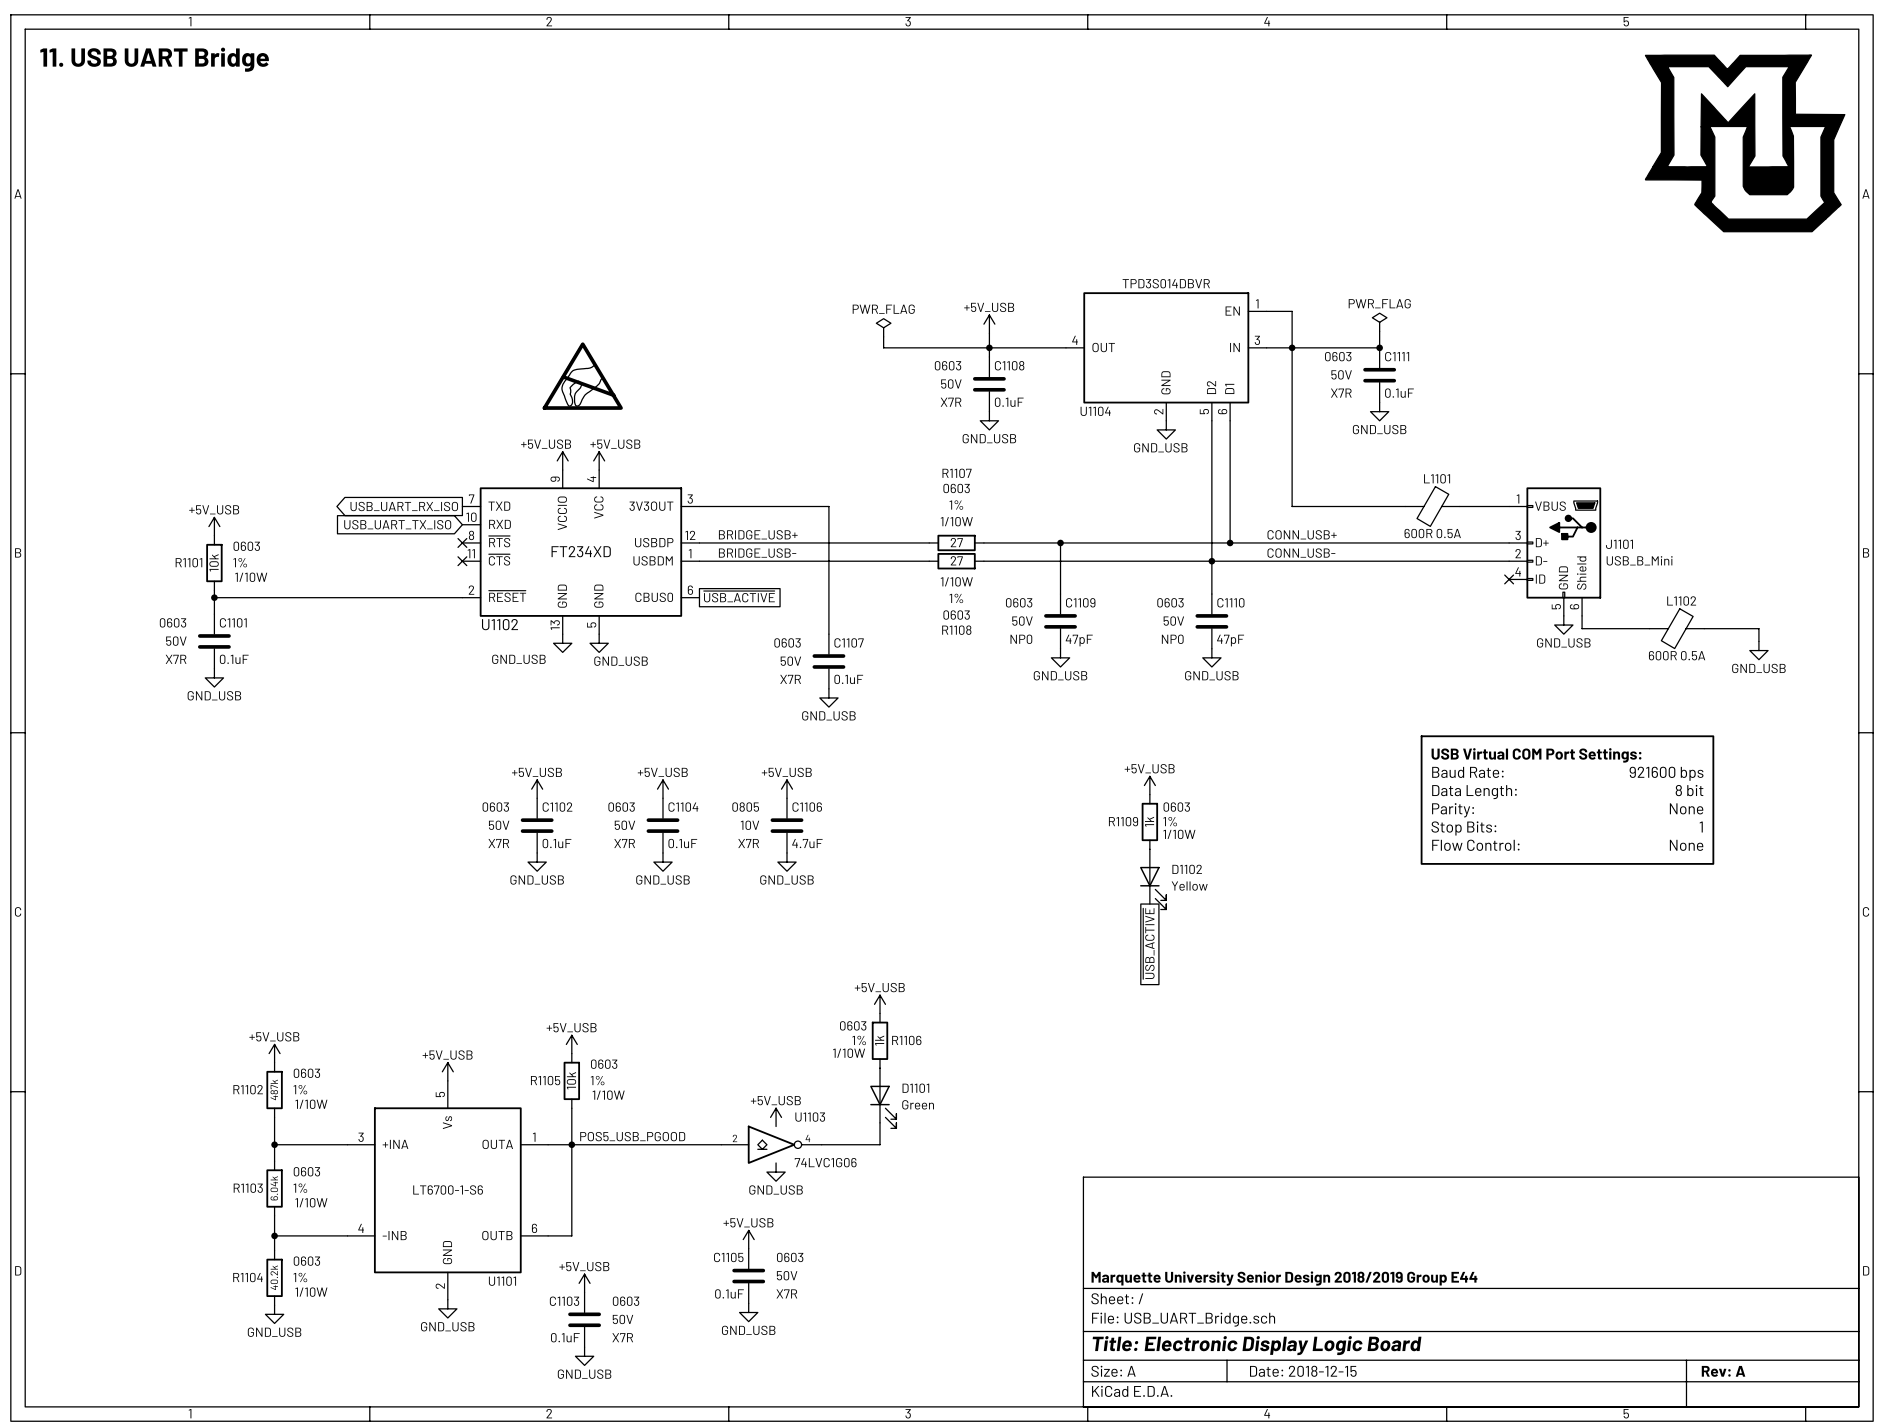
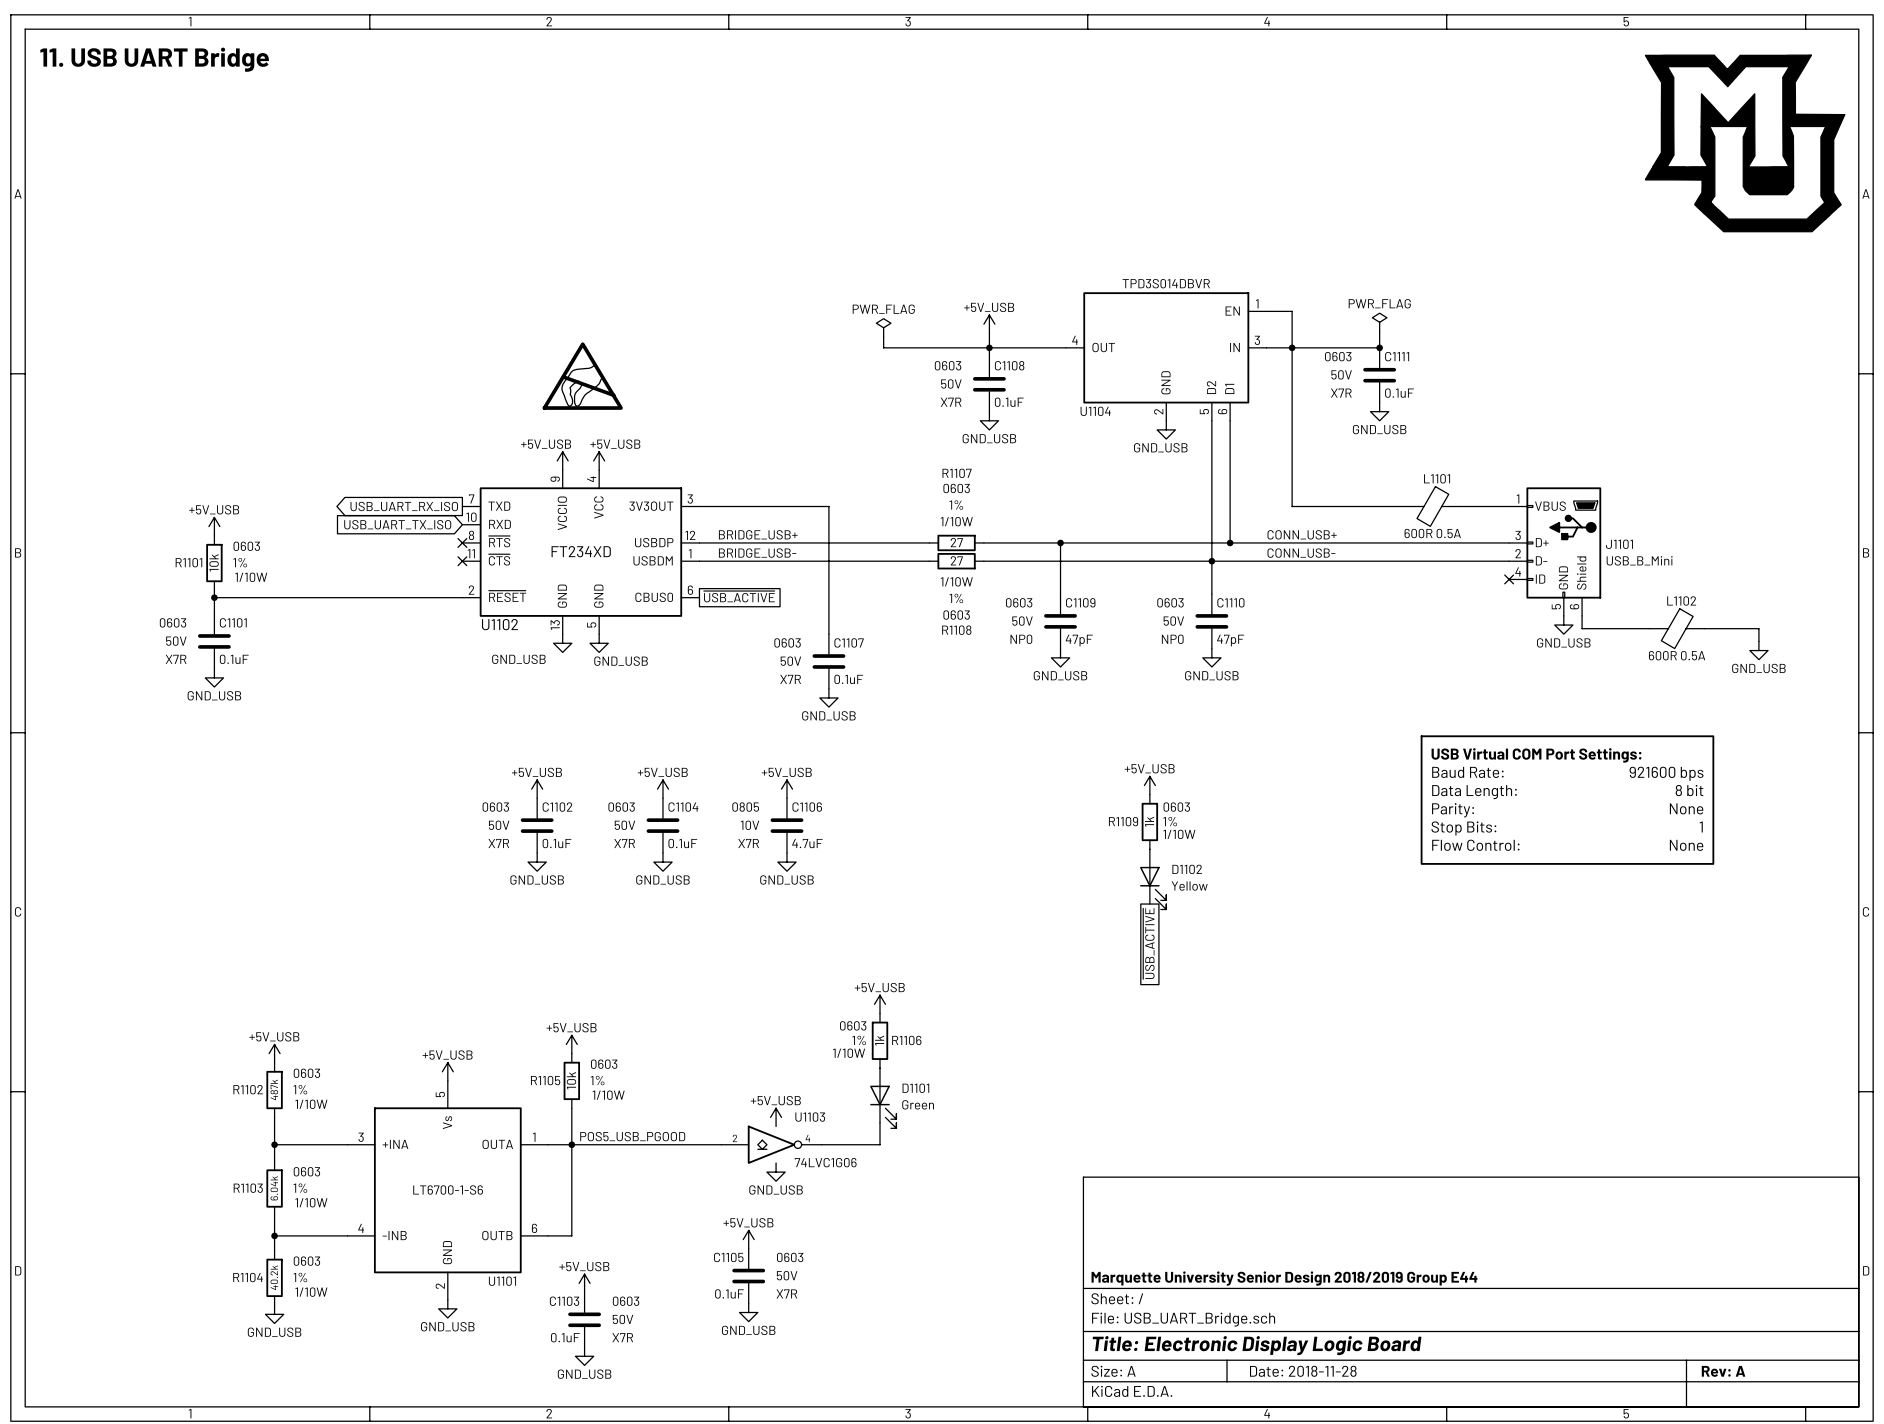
title block: Date: 2018-12-15 (1303, 1371) -> Date: 2018-11-28 (1303, 1371)

